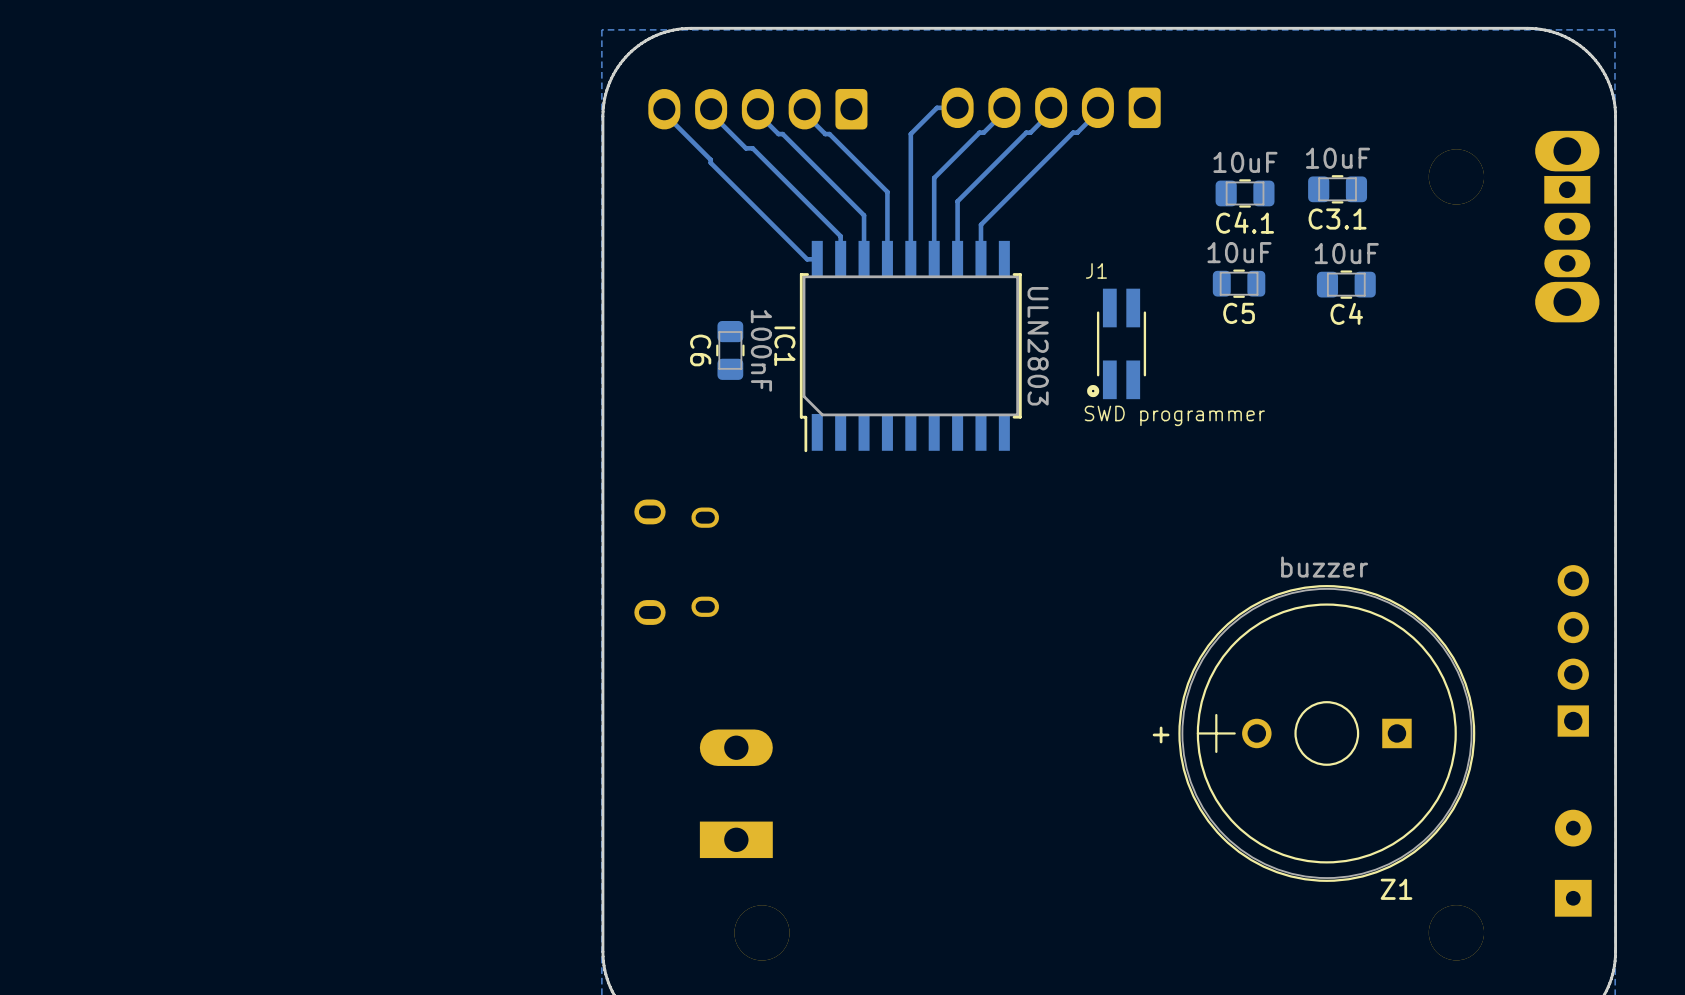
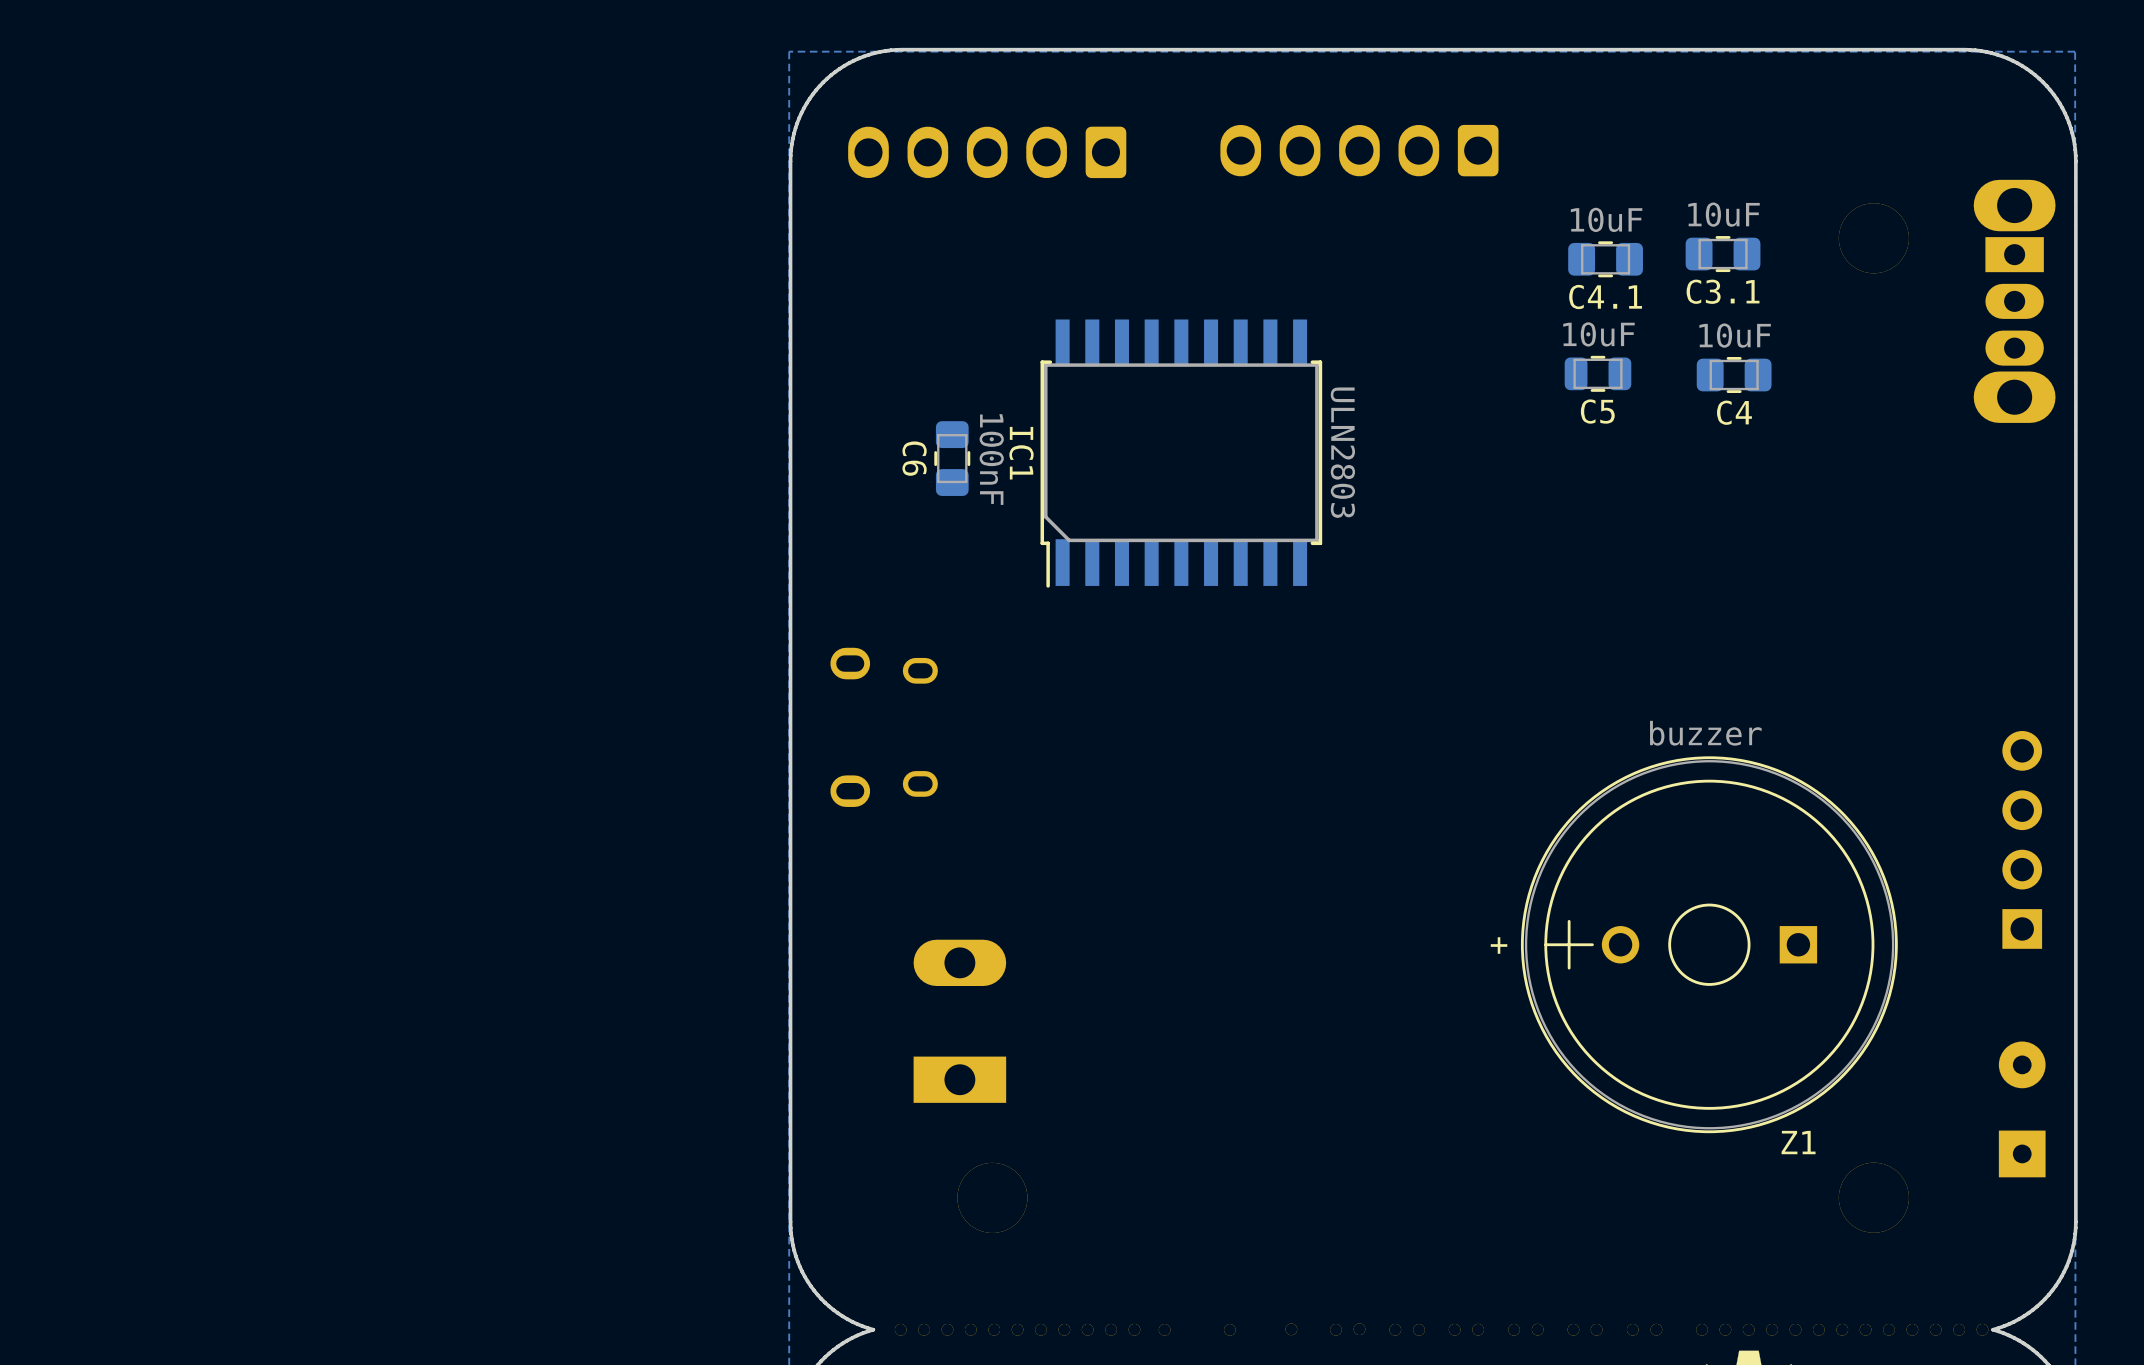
track: (957, 107) (936, 107) (910, 133) (910, 259) -> none
track: (1004, 107) (1004, 112) (983, 132) (979, 132) (934, 177) (934, 259) -> none
track: (1051, 107) (1051, 112) (1030, 132) (1026, 132) (957, 201) (957, 259) -> none
track: (1097, 107) (1097, 112) (1077, 132) (1073, 132) (980, 224) (980, 259) -> none
track: (664, 109) (664, 113) (710, 159) (710, 162) (807, 259) (817, 259) -> none
track: (711, 109) (711, 113) (746, 148) (752, 148) (840, 236) (840, 259) -> none
track: (757, 109) (757, 113) (778, 134) (782, 134) (864, 215) (864, 259) -> none
track: (804, 109) (804, 113) (825, 134) (829, 134) (887, 191) (887, 259) -> none
J1: SWD programmer (1116, 343) -> none

